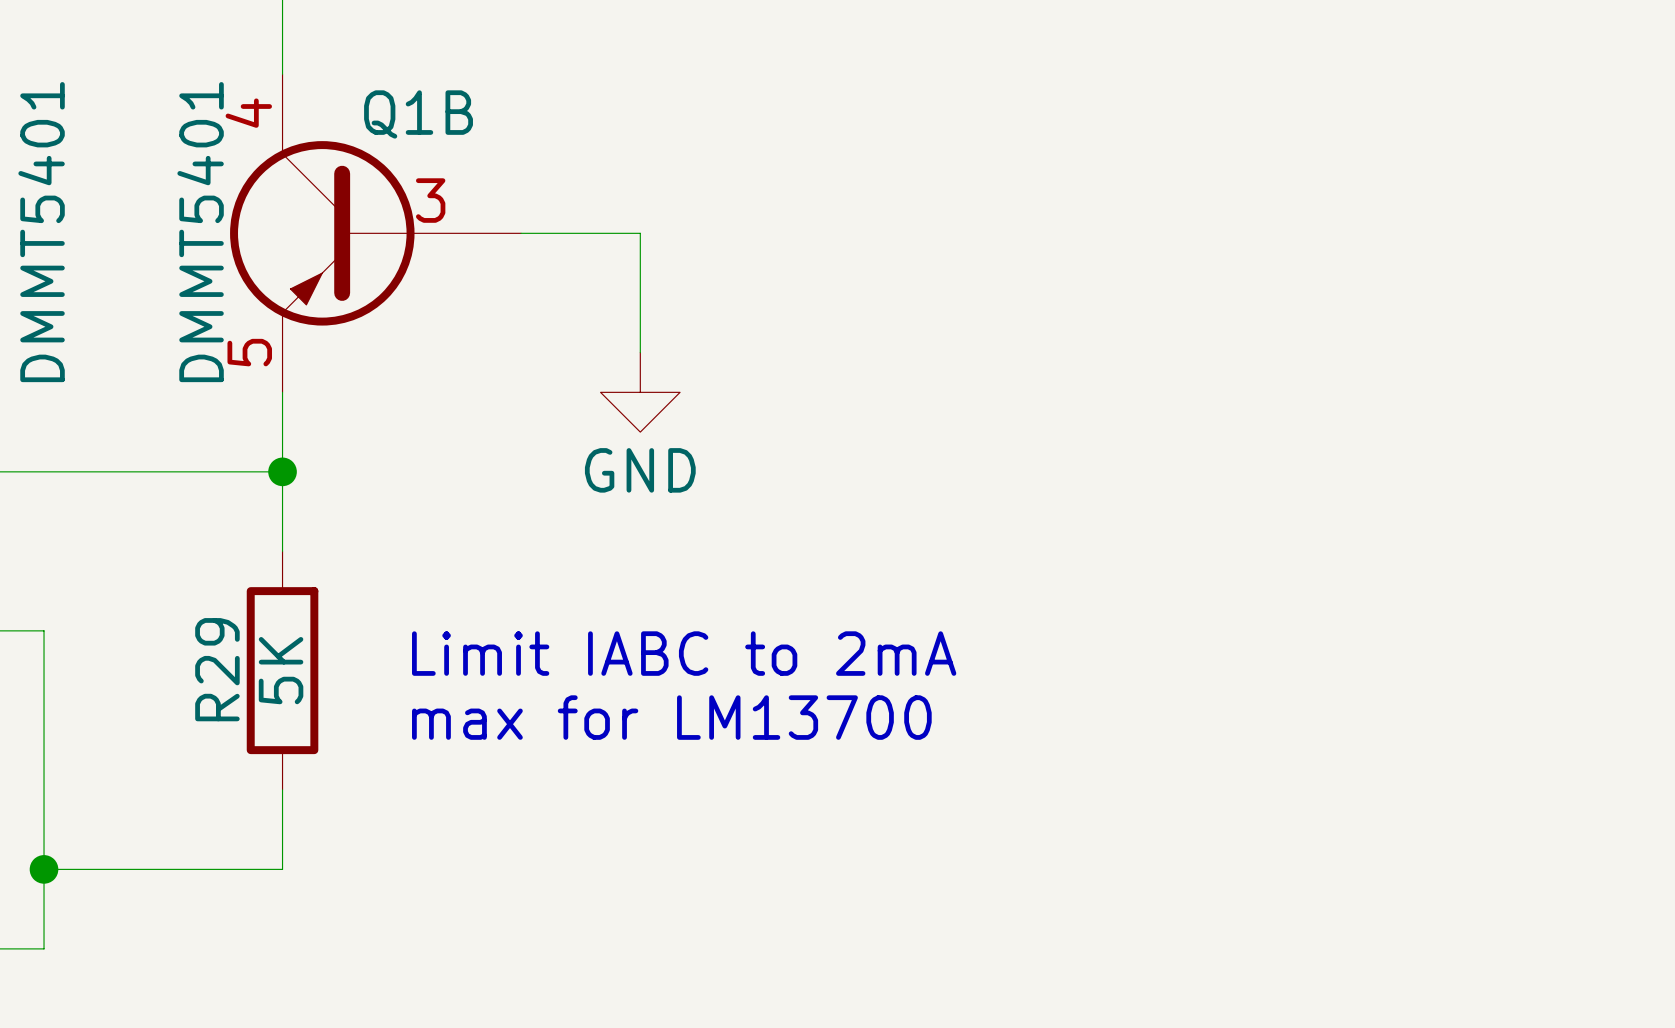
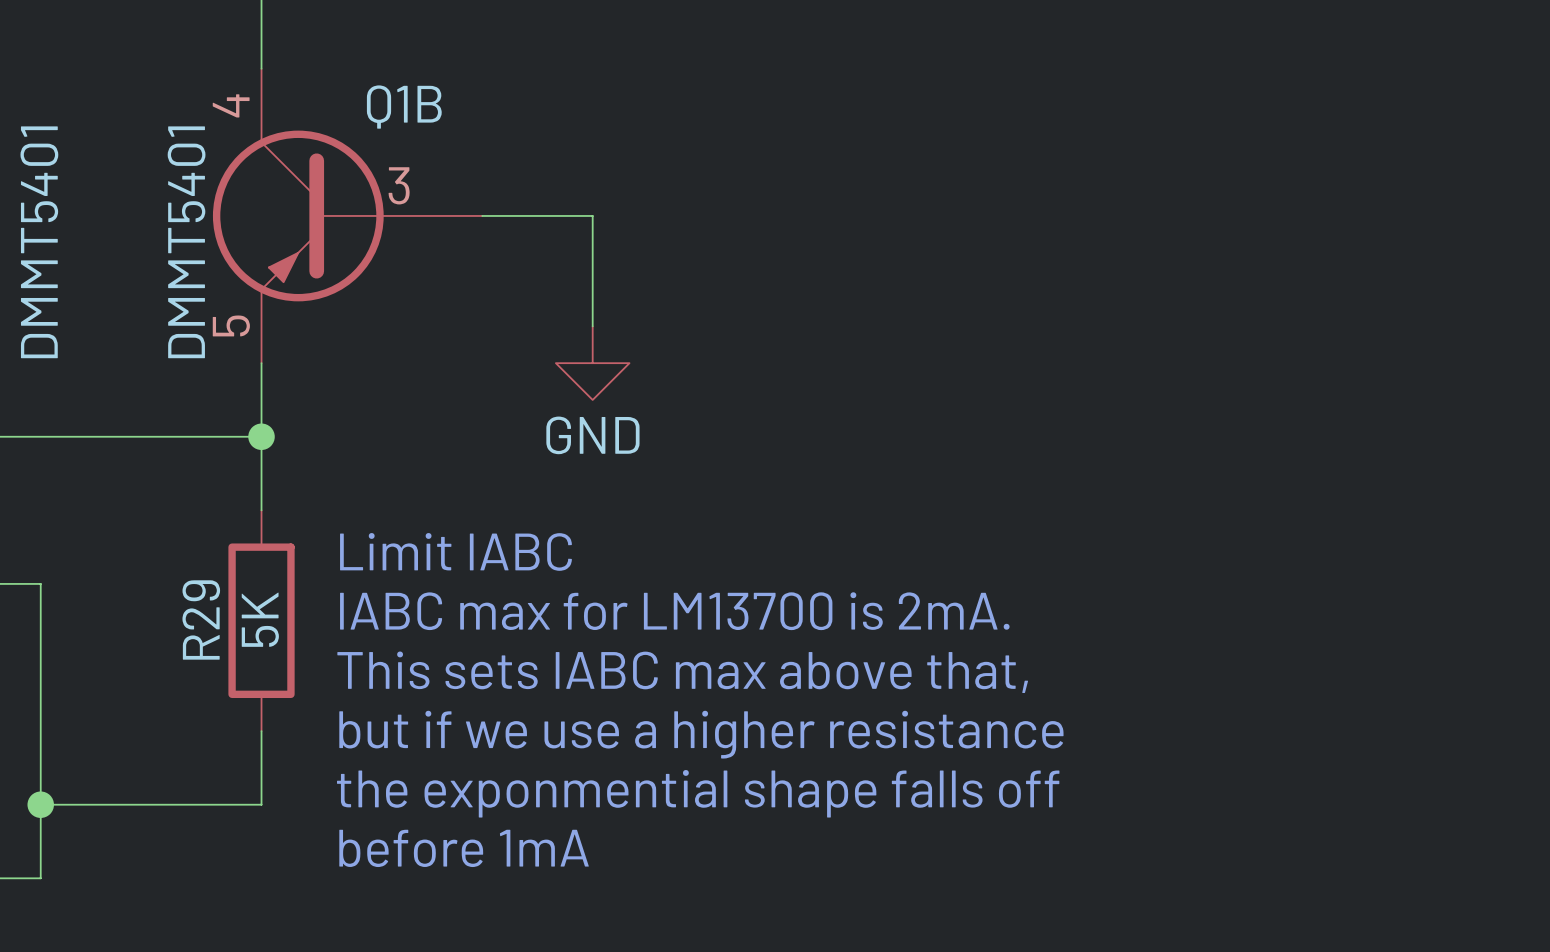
text: Limit IABC to 2mA (684, 653) -> Limit IABC (455, 551)
text: max for LM13700 (671, 717) -> IABC max for LM13700 is 2mA. (674, 611)
text: none -> This sets IABC max above that, (682, 672)
text: none -> but if we use a higher resistance (701, 734)
text: none -> the exponmential shape falls off (698, 793)
text: none -> before 1mA (464, 848)

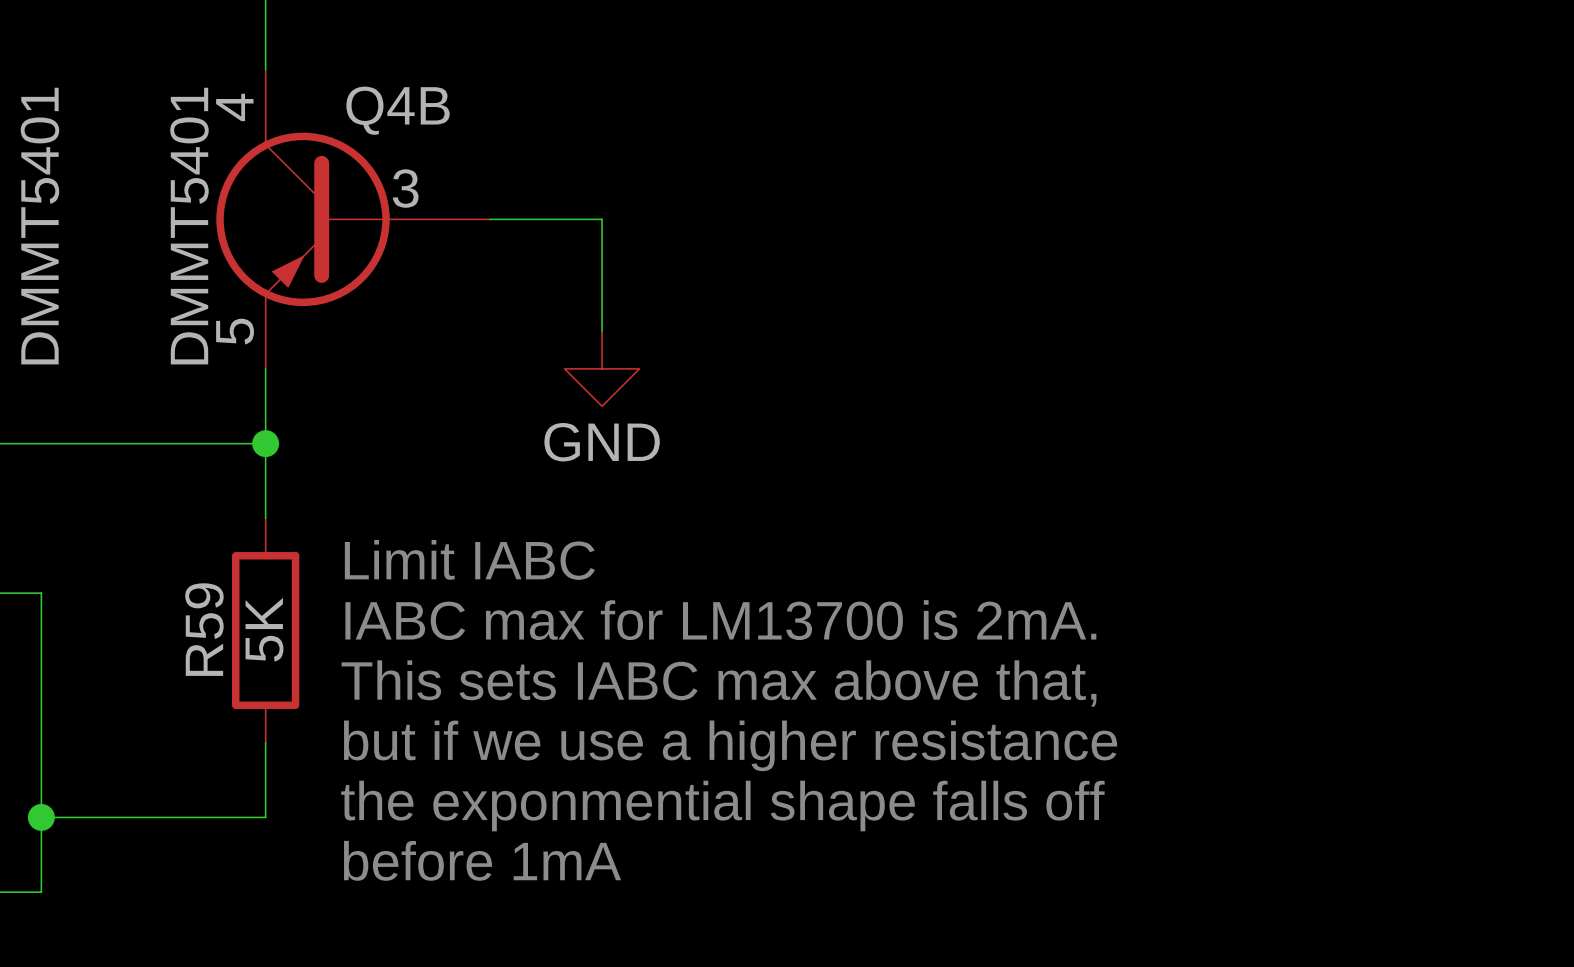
Q1B name: Q1B (404, 107) -> Q4B (398, 110)
R29 name: R29 (201, 619) -> R59 (204, 629)

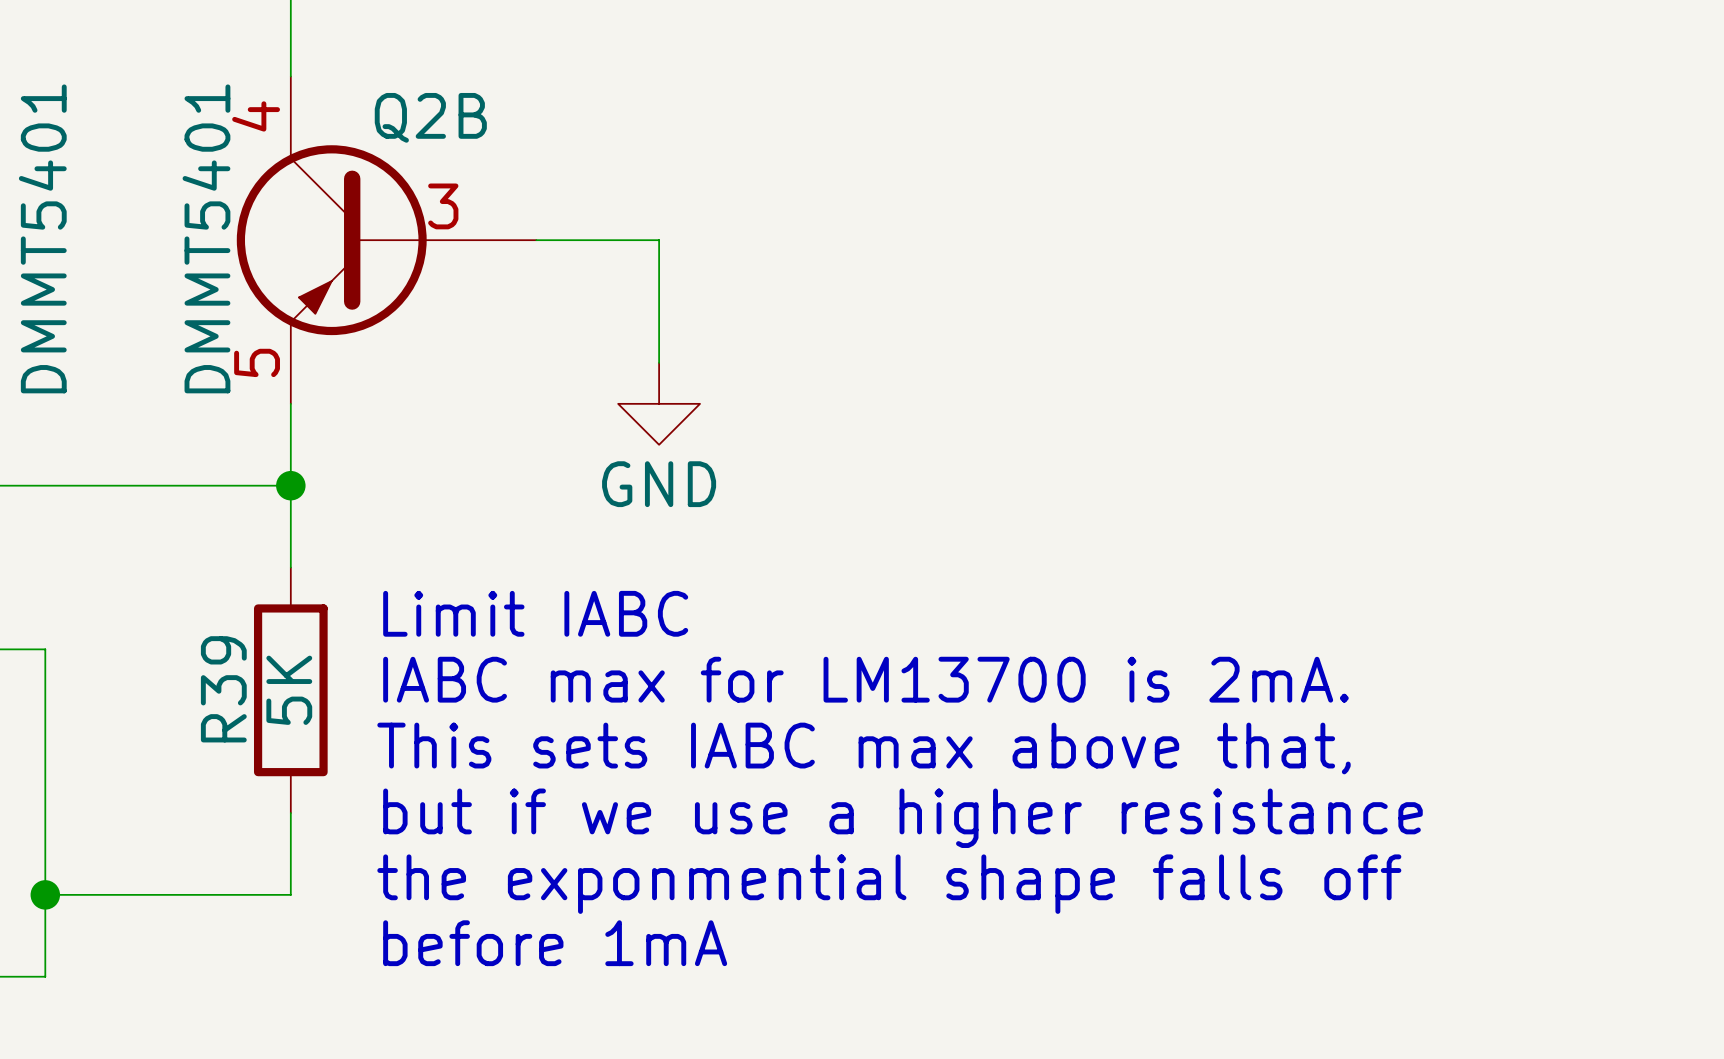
Q4B name: Q4B (398, 110) -> Q2B (430, 117)
R59 name: R59 (204, 629) -> R39 (223, 689)

